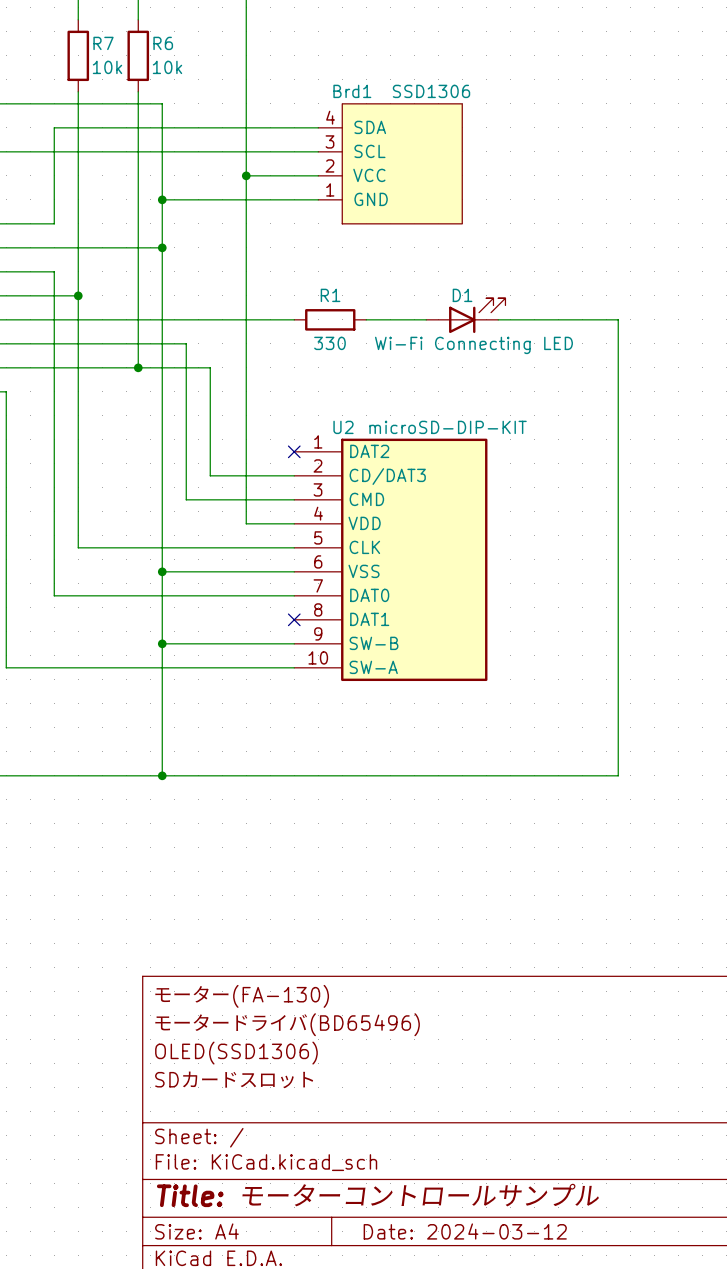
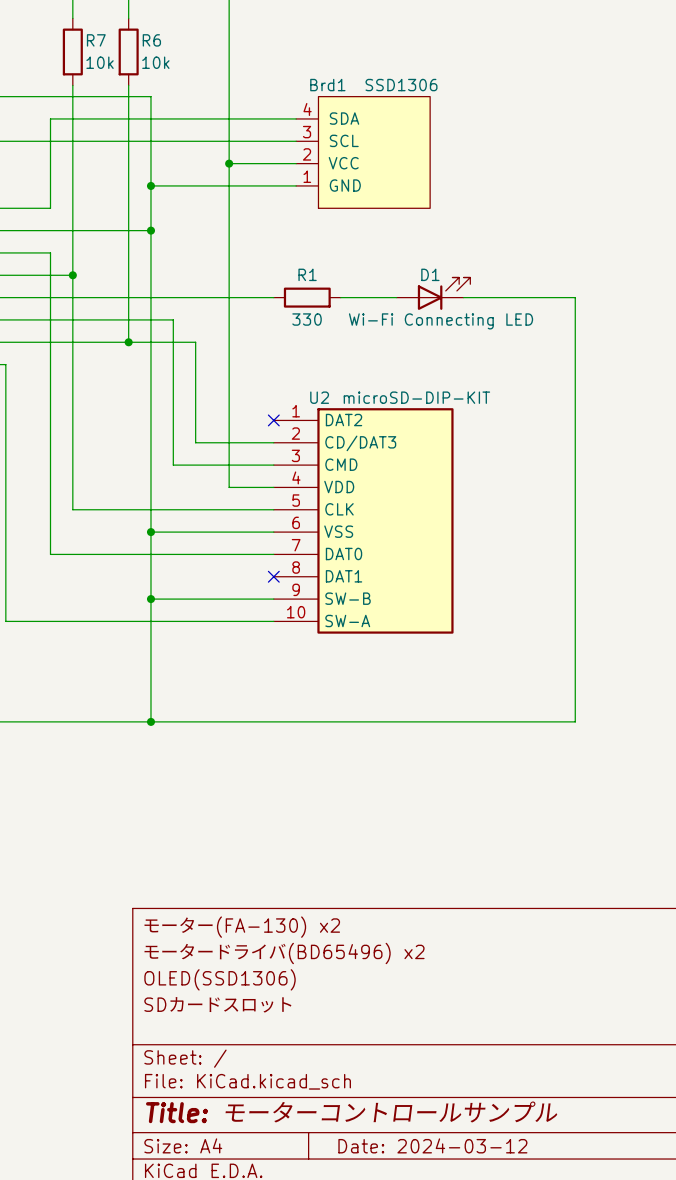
title block: モーター(FA-130) (241, 996) -> モーター(FA-130) x2 (241, 927)
title block: モータードライバ(BD65496) (287, 1024) -> モータードライバ(BD65496) x2 (284, 953)

